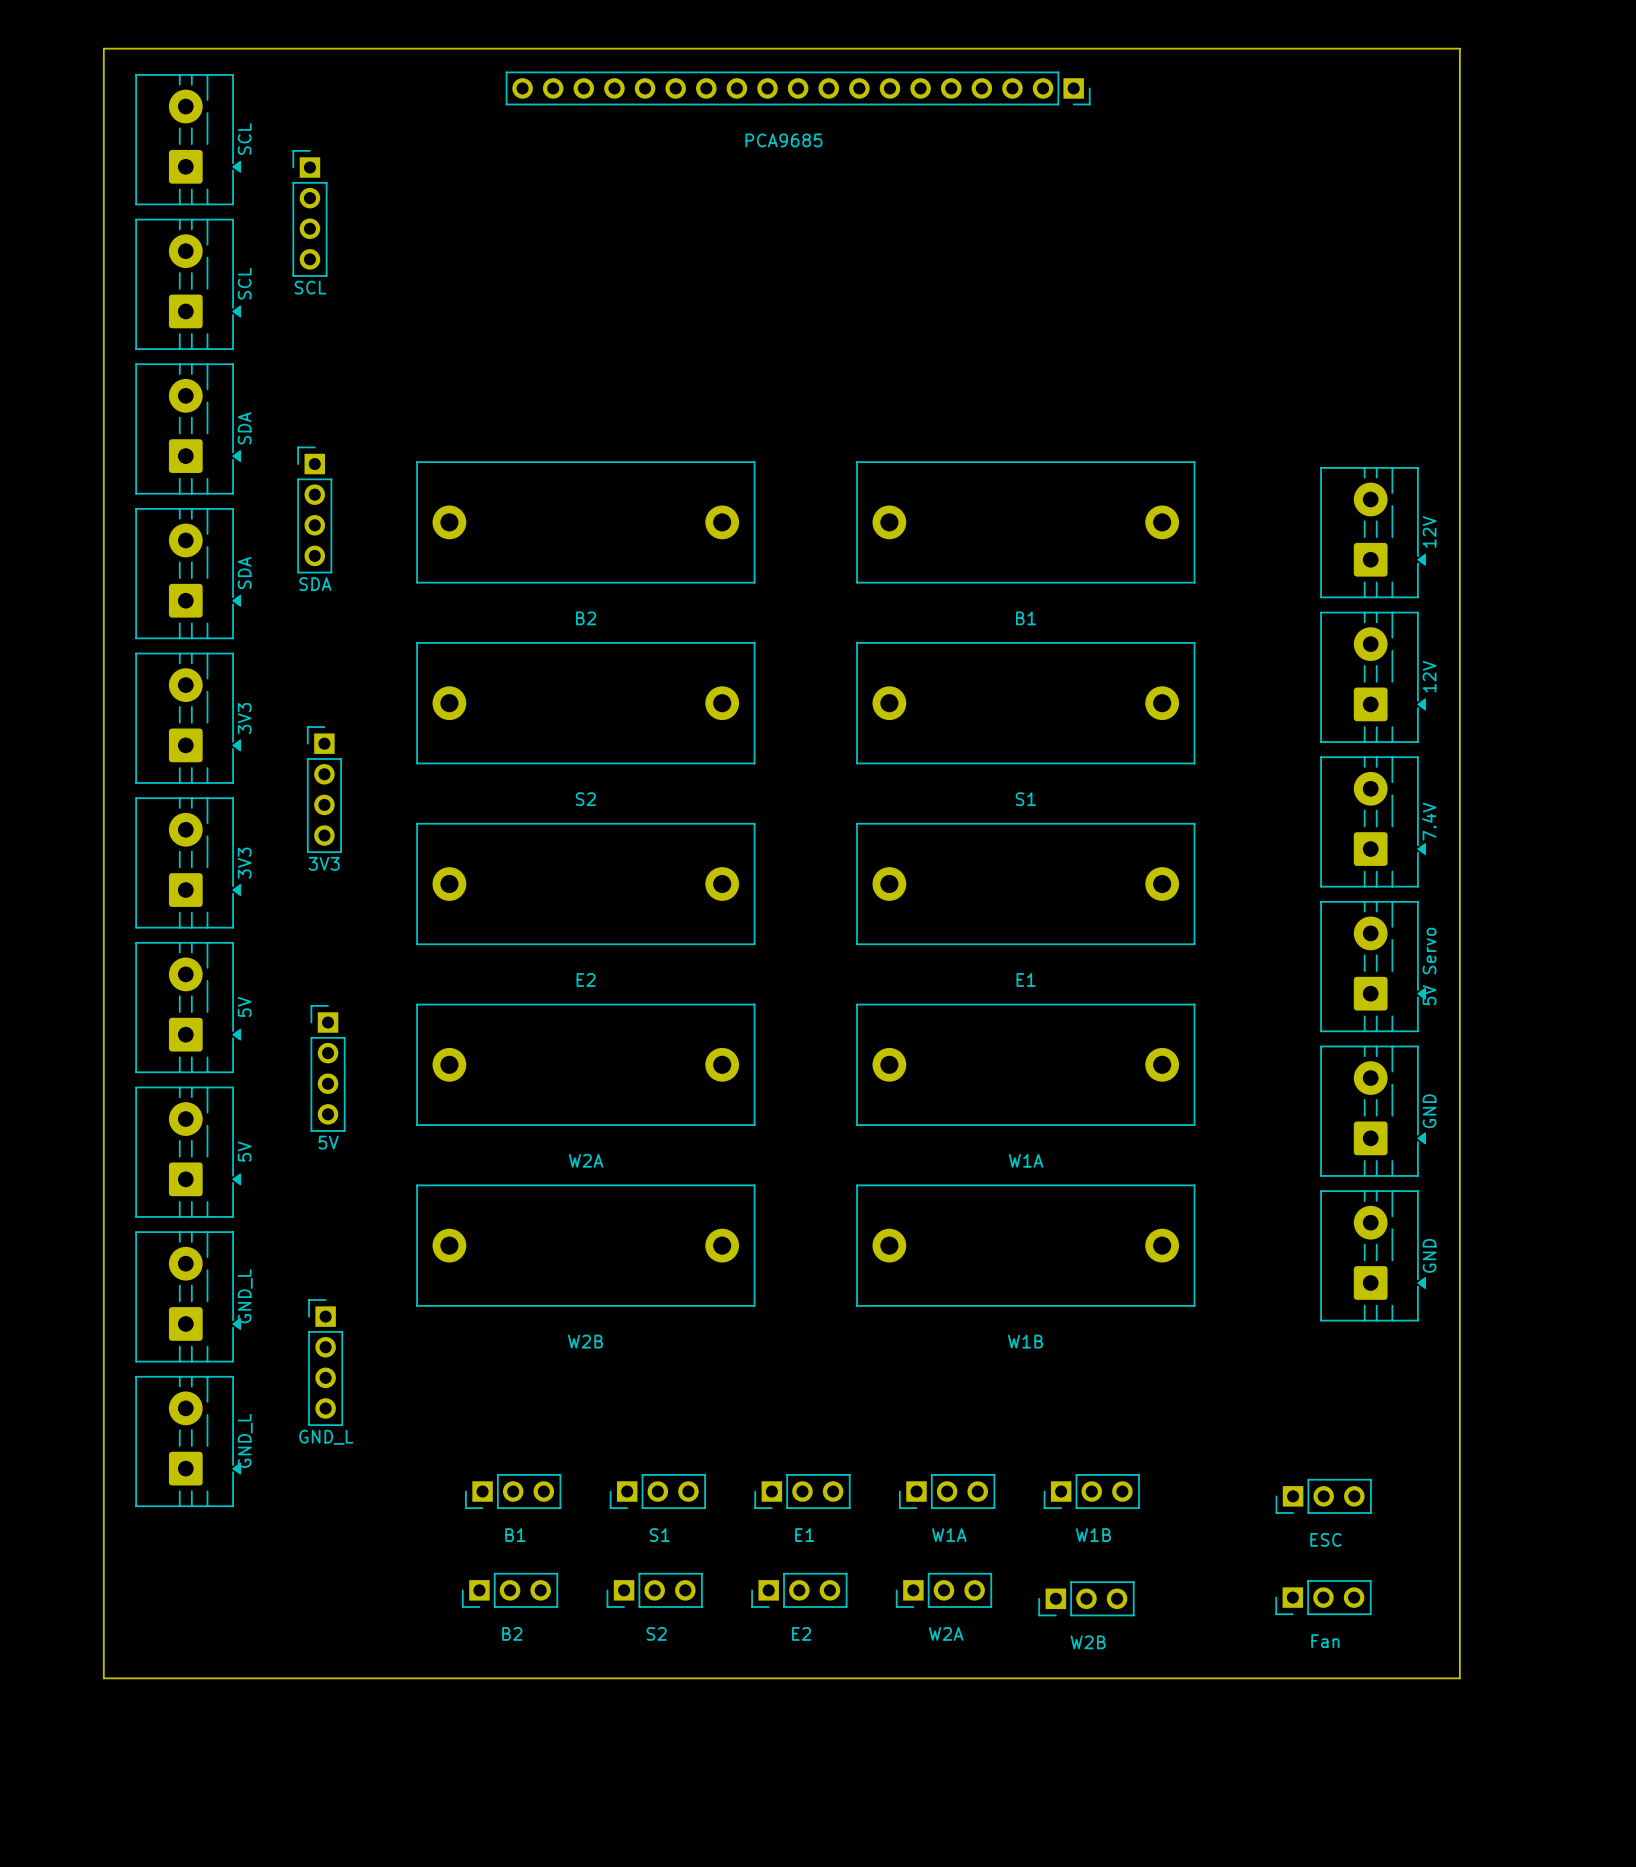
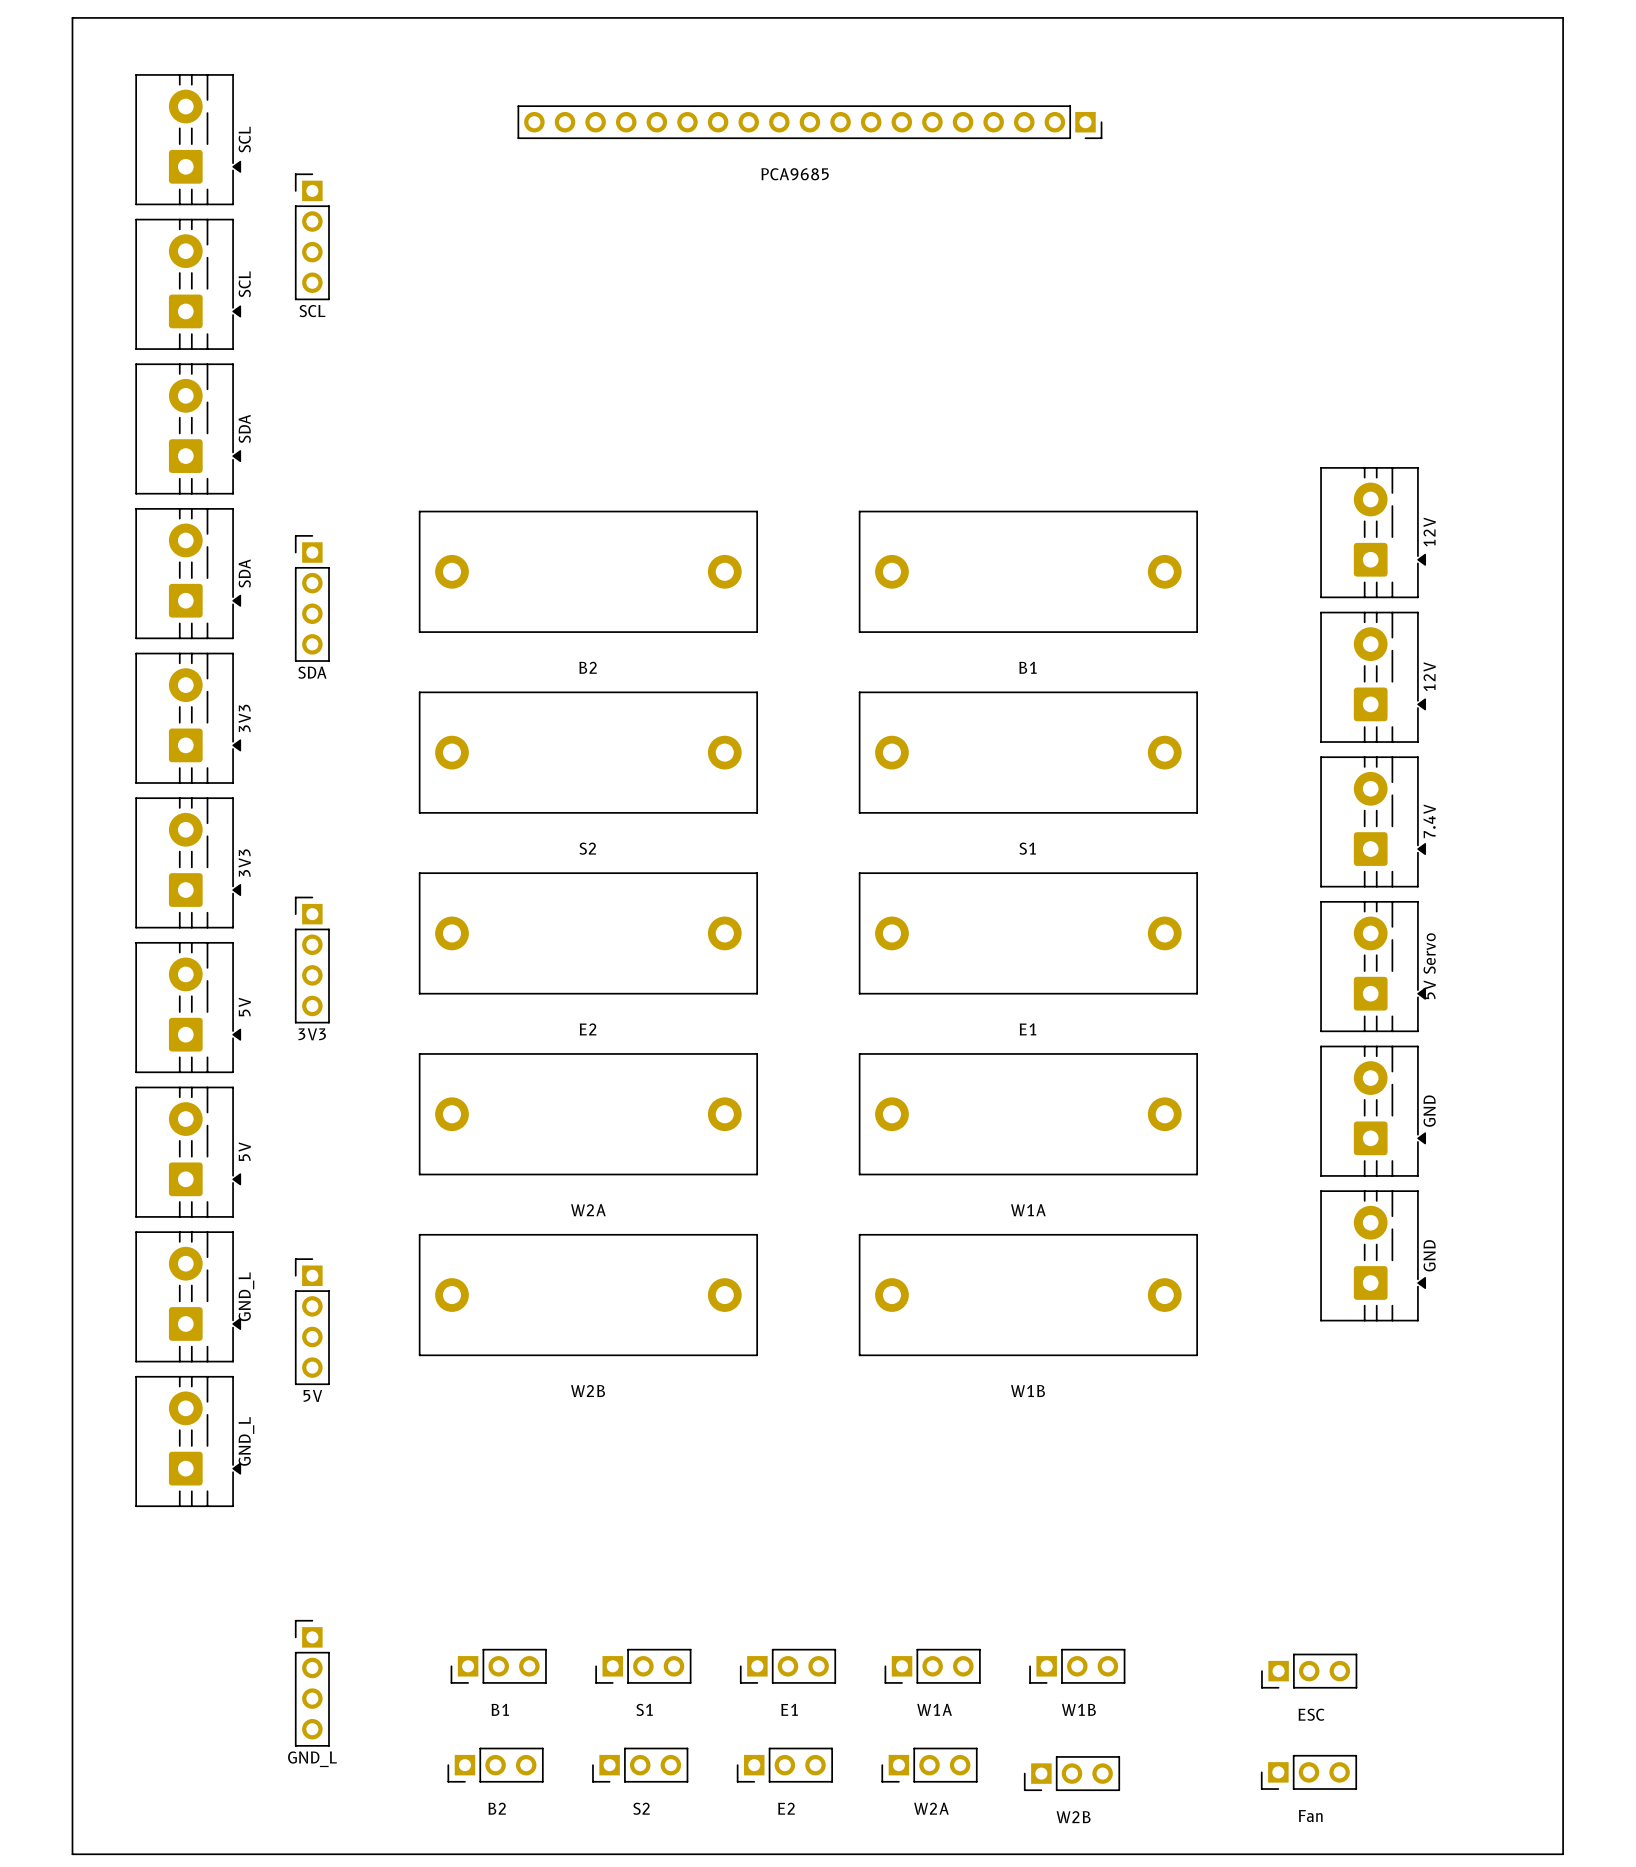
board edge: (103, 48) (1459, 48) (1459, 1678) (103, 1678) (103, 48) -> (72, 17) (72, 1854) (1563, 1854) (1563, 17) (72, 17)
part position: (798, 88) -> (809, 122)
part position: (309, 213) -> (312, 236)
part position: (314, 509) -> (312, 598)
part position: (585, 522) -> (588, 571)
part position: (1025, 522) -> (1028, 571)
part position: (585, 703) -> (588, 752)
part position: (1025, 703) -> (1028, 752)
part position: (324, 789) -> (312, 960)
part position: (585, 884) -> (588, 933)
part position: (1025, 884) -> (1028, 933)
part position: (585, 1064) -> (588, 1114)
part position: (1025, 1064) -> (1028, 1114)
part position: (328, 1068) -> (312, 1321)
part position: (585, 1245) -> (588, 1295)
part position: (1025, 1245) -> (1028, 1295)
part: GND_L (325, 1362) -> none
part position: (513, 1491) -> (498, 1666)
part position: (657, 1491) -> (643, 1666)
part position: (802, 1491) -> (788, 1666)
part position: (947, 1491) -> (932, 1666)
part position: (1091, 1491) -> (1077, 1666)
part position: (1323, 1496) -> (1309, 1671)
part position: (510, 1590) -> (495, 1765)
part position: (654, 1590) -> (640, 1765)
part position: (799, 1590) -> (784, 1765)
part position: (943, 1590) -> (929, 1765)
part position: (1323, 1597) -> (1308, 1772)
part position: (1086, 1598) -> (1072, 1773)
part: none -> GND_L (312, 1683)

